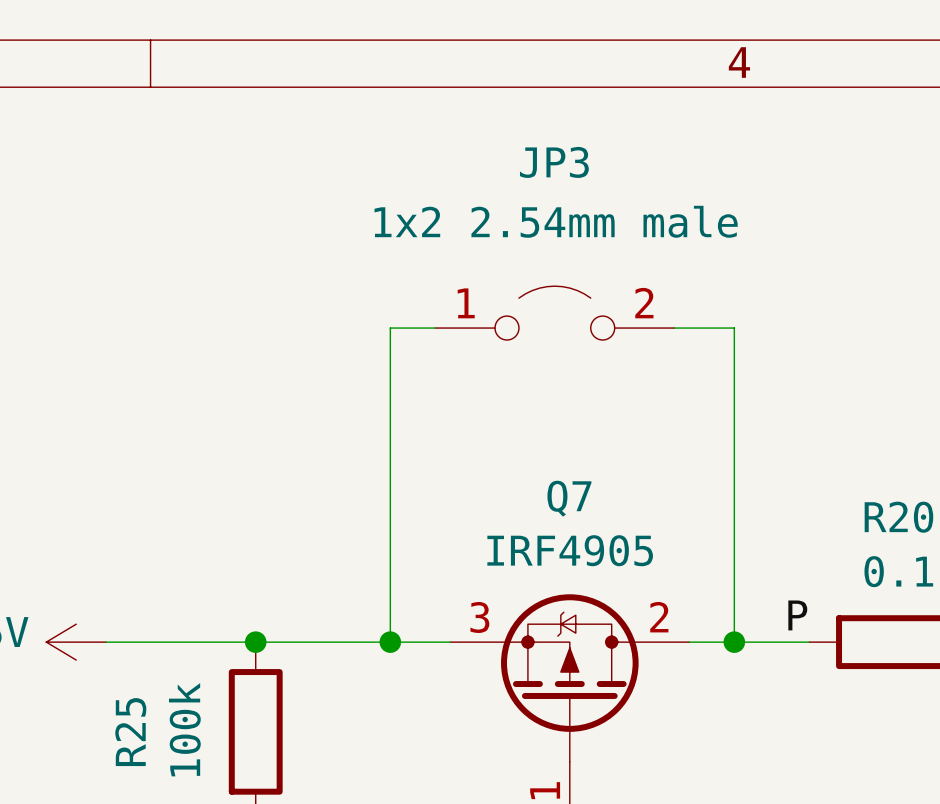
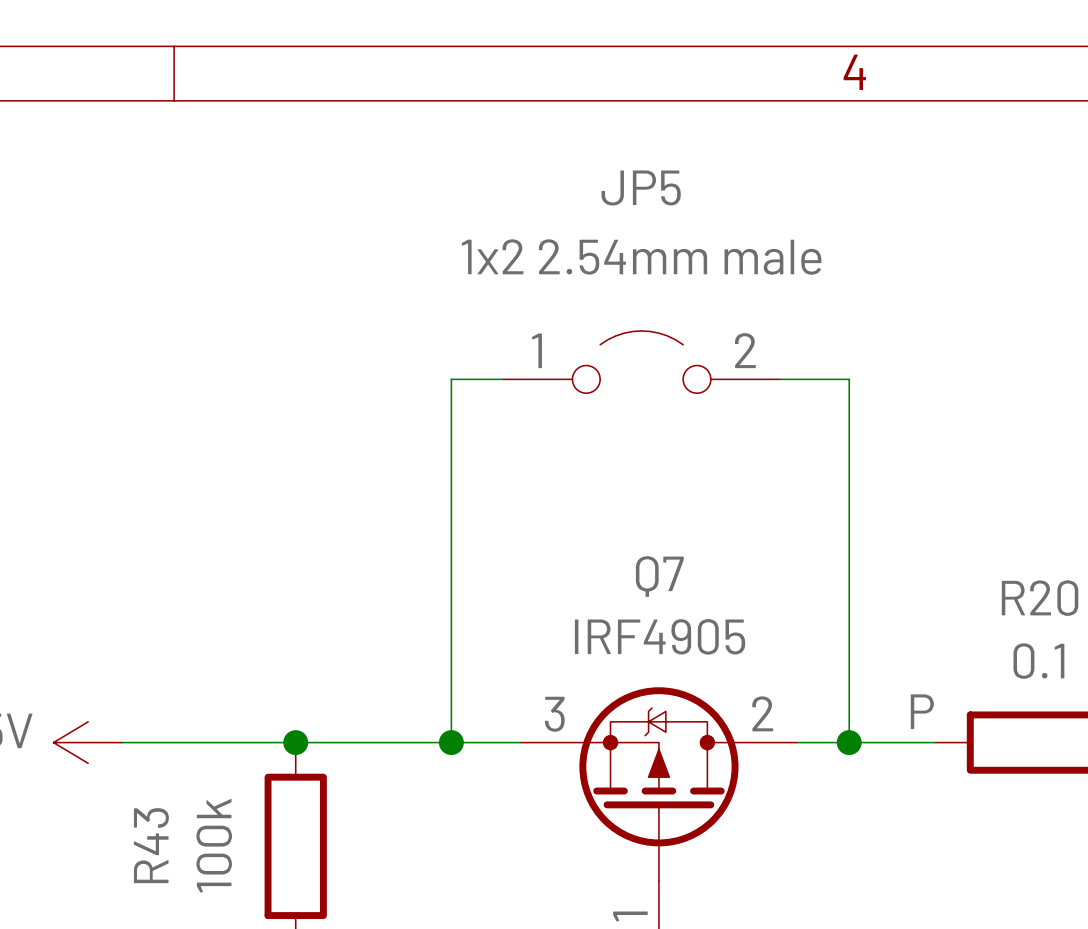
JP3 name: JP3 (554, 162) -> JP5 (641, 187)
R25 name: R25 (130, 732) -> R43 (151, 845)

